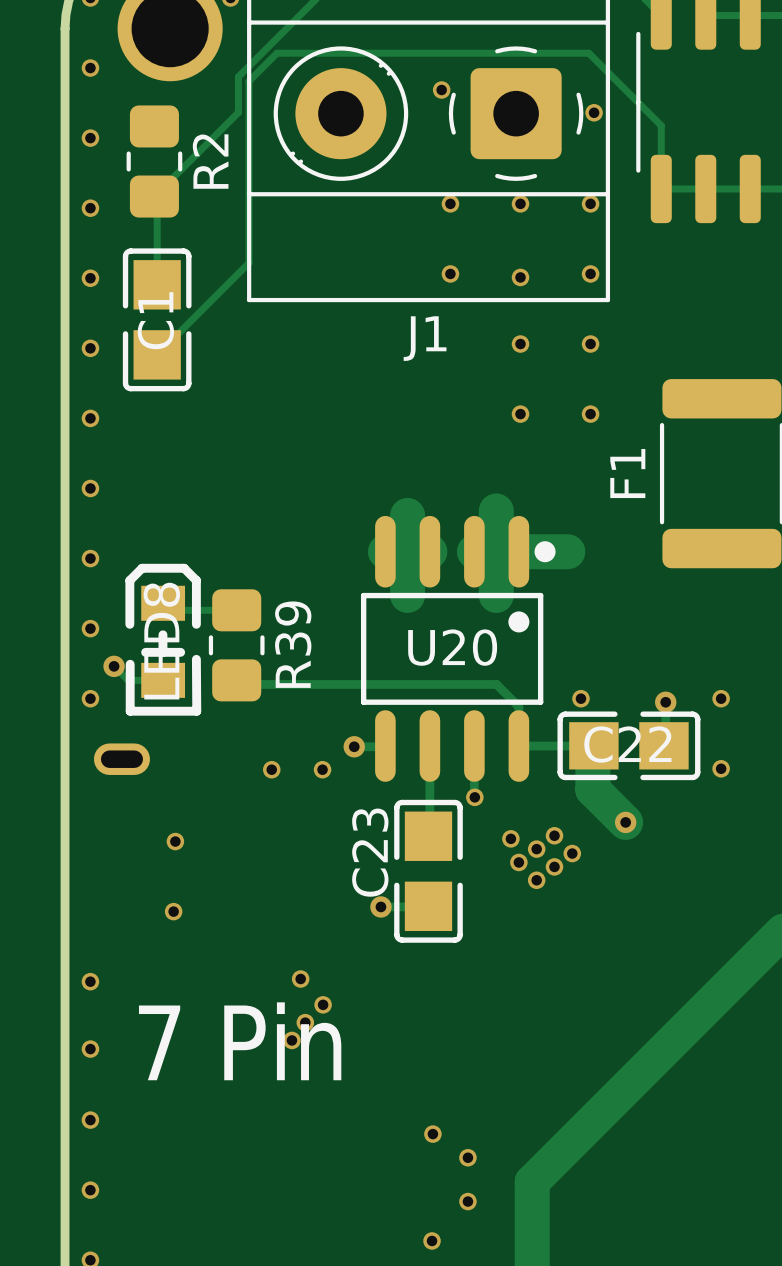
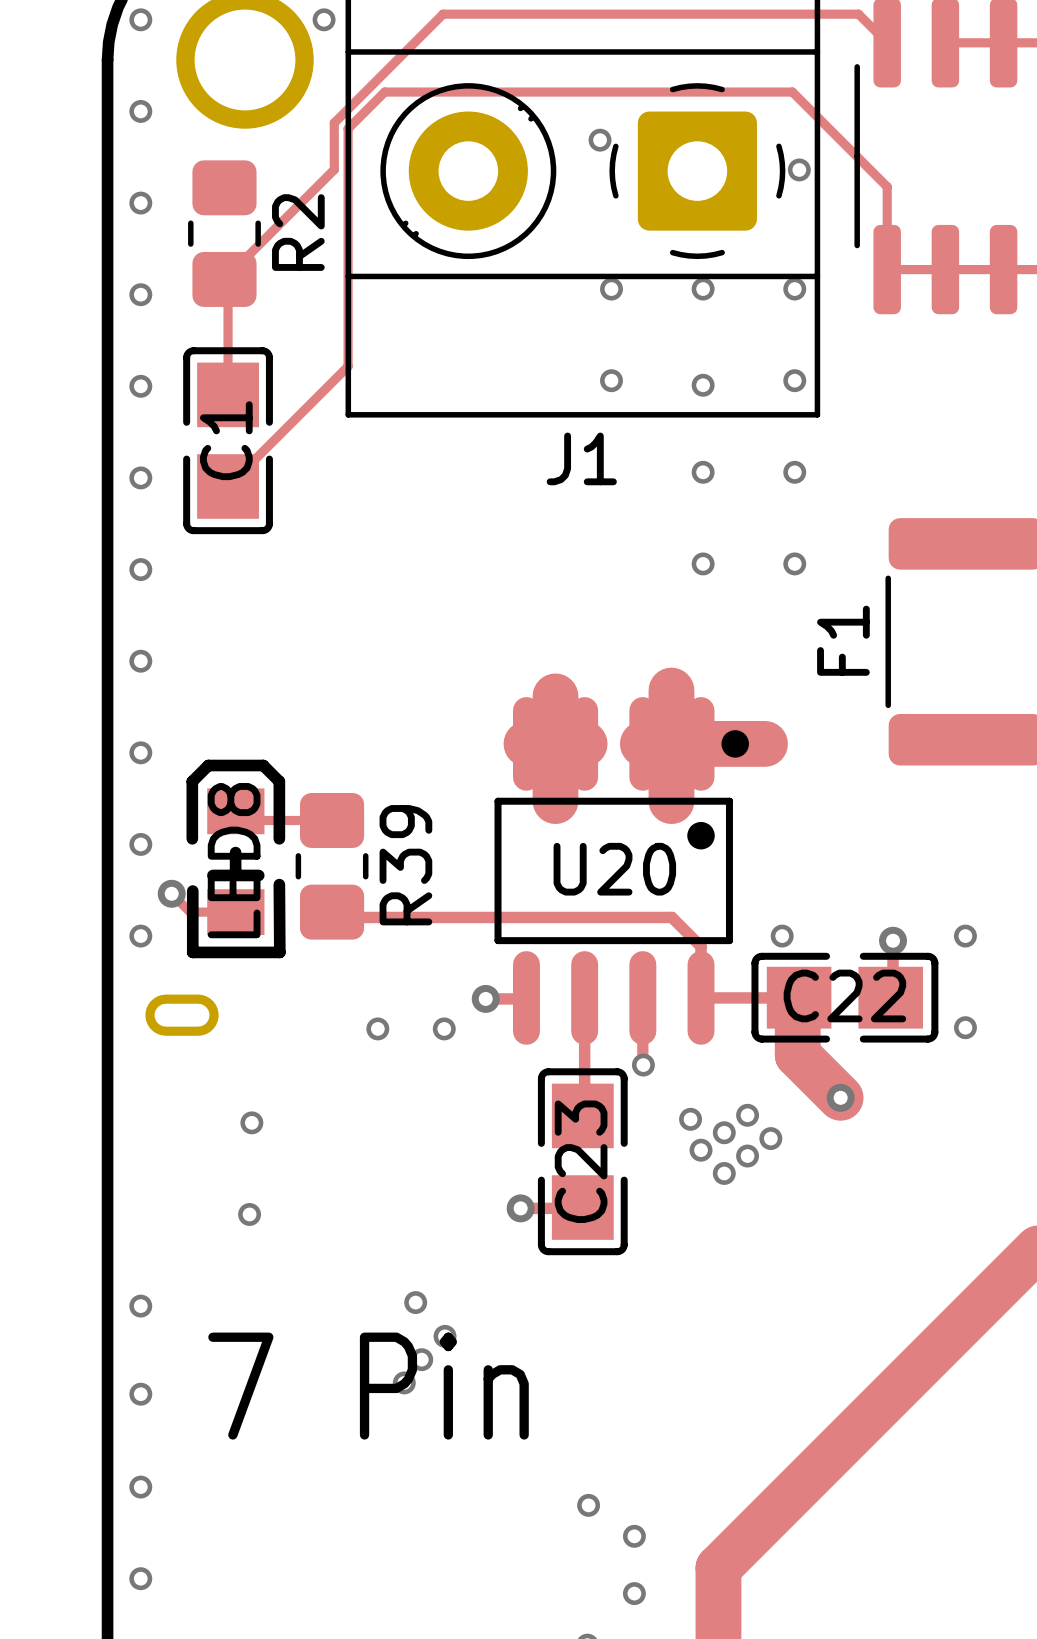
C23 name position: C23 (370, 852) -> C23 (581, 1161)

